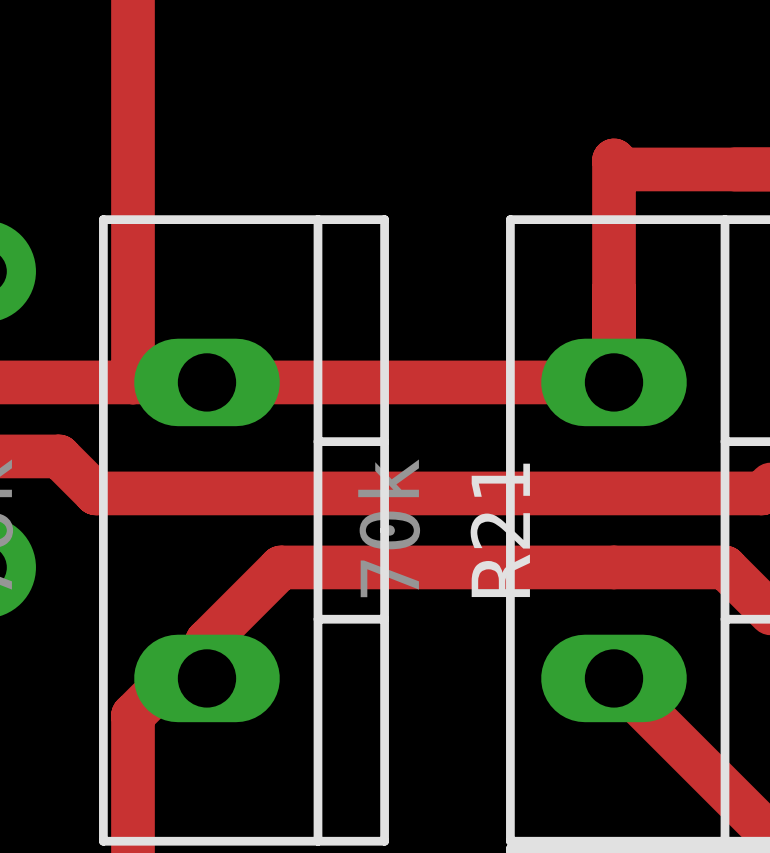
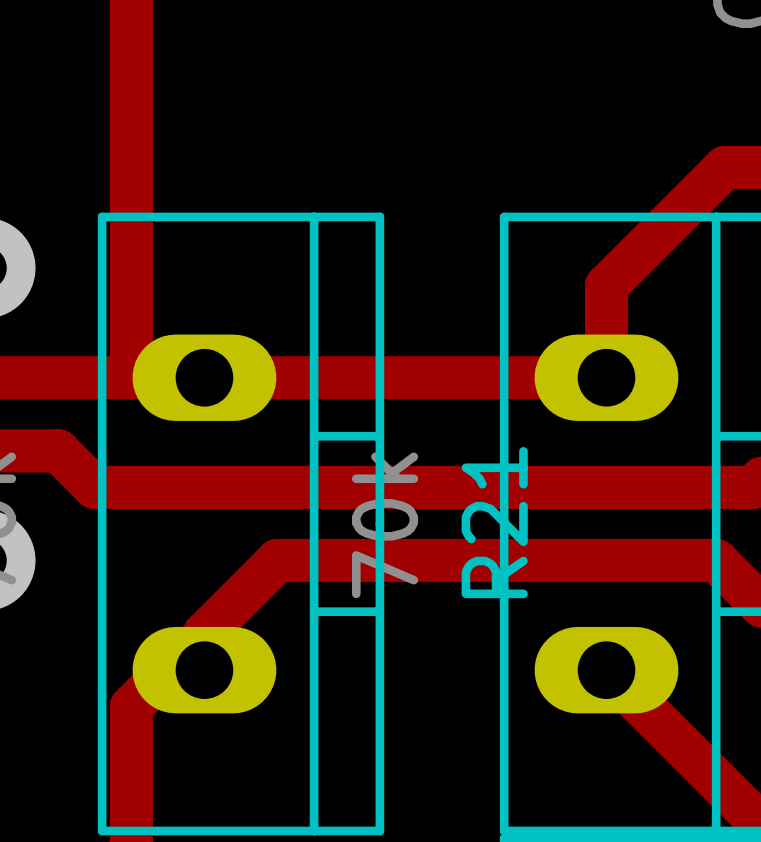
track: (734, 169) (623, 169) (614, 160) (614, 289) -> (725, 167) (606, 285)

